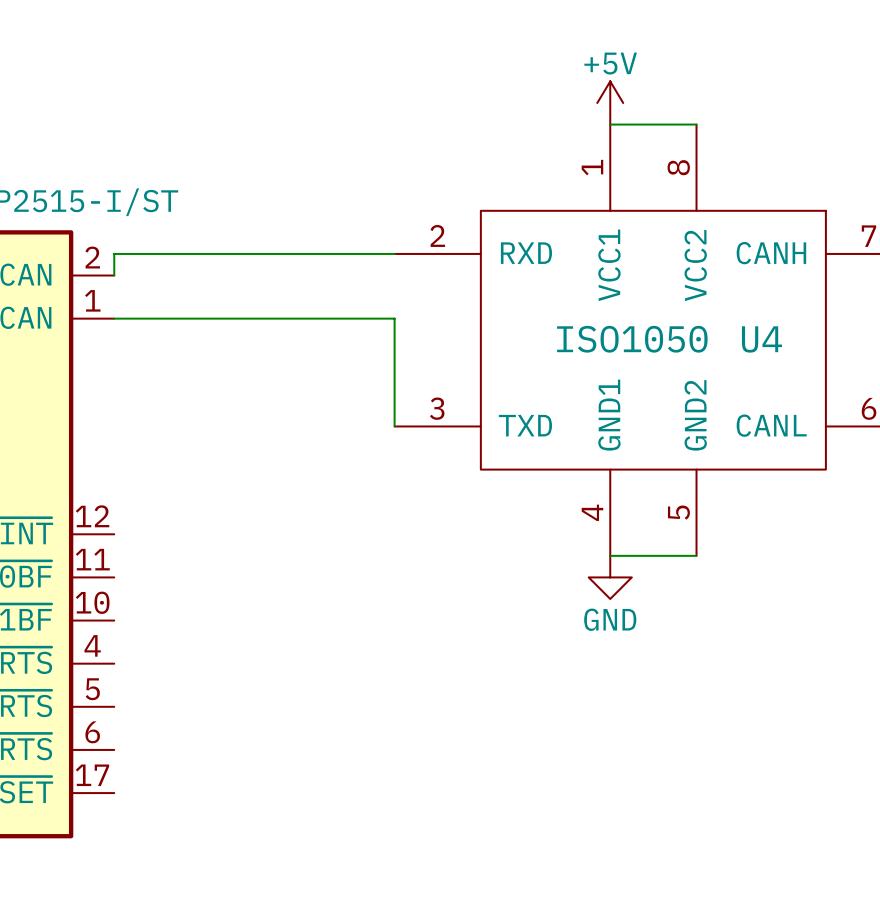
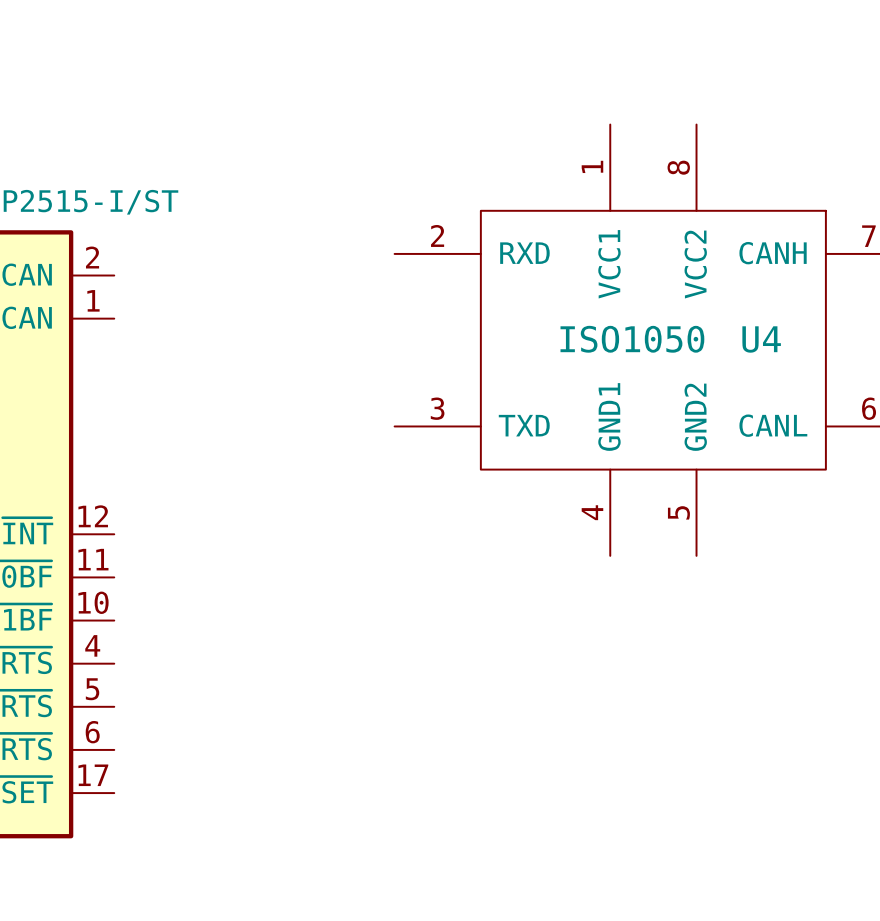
power symbol: +5V (610, 102) -> none
wire: (610, 124) (696, 124) -> none
wire: (394, 253) (114, 253) (114, 275) -> none
wire: (114, 318) (394, 318) (394, 426) -> none
wire: (610, 555) (696, 555) -> none
power symbol: GND (610, 577) -> none

